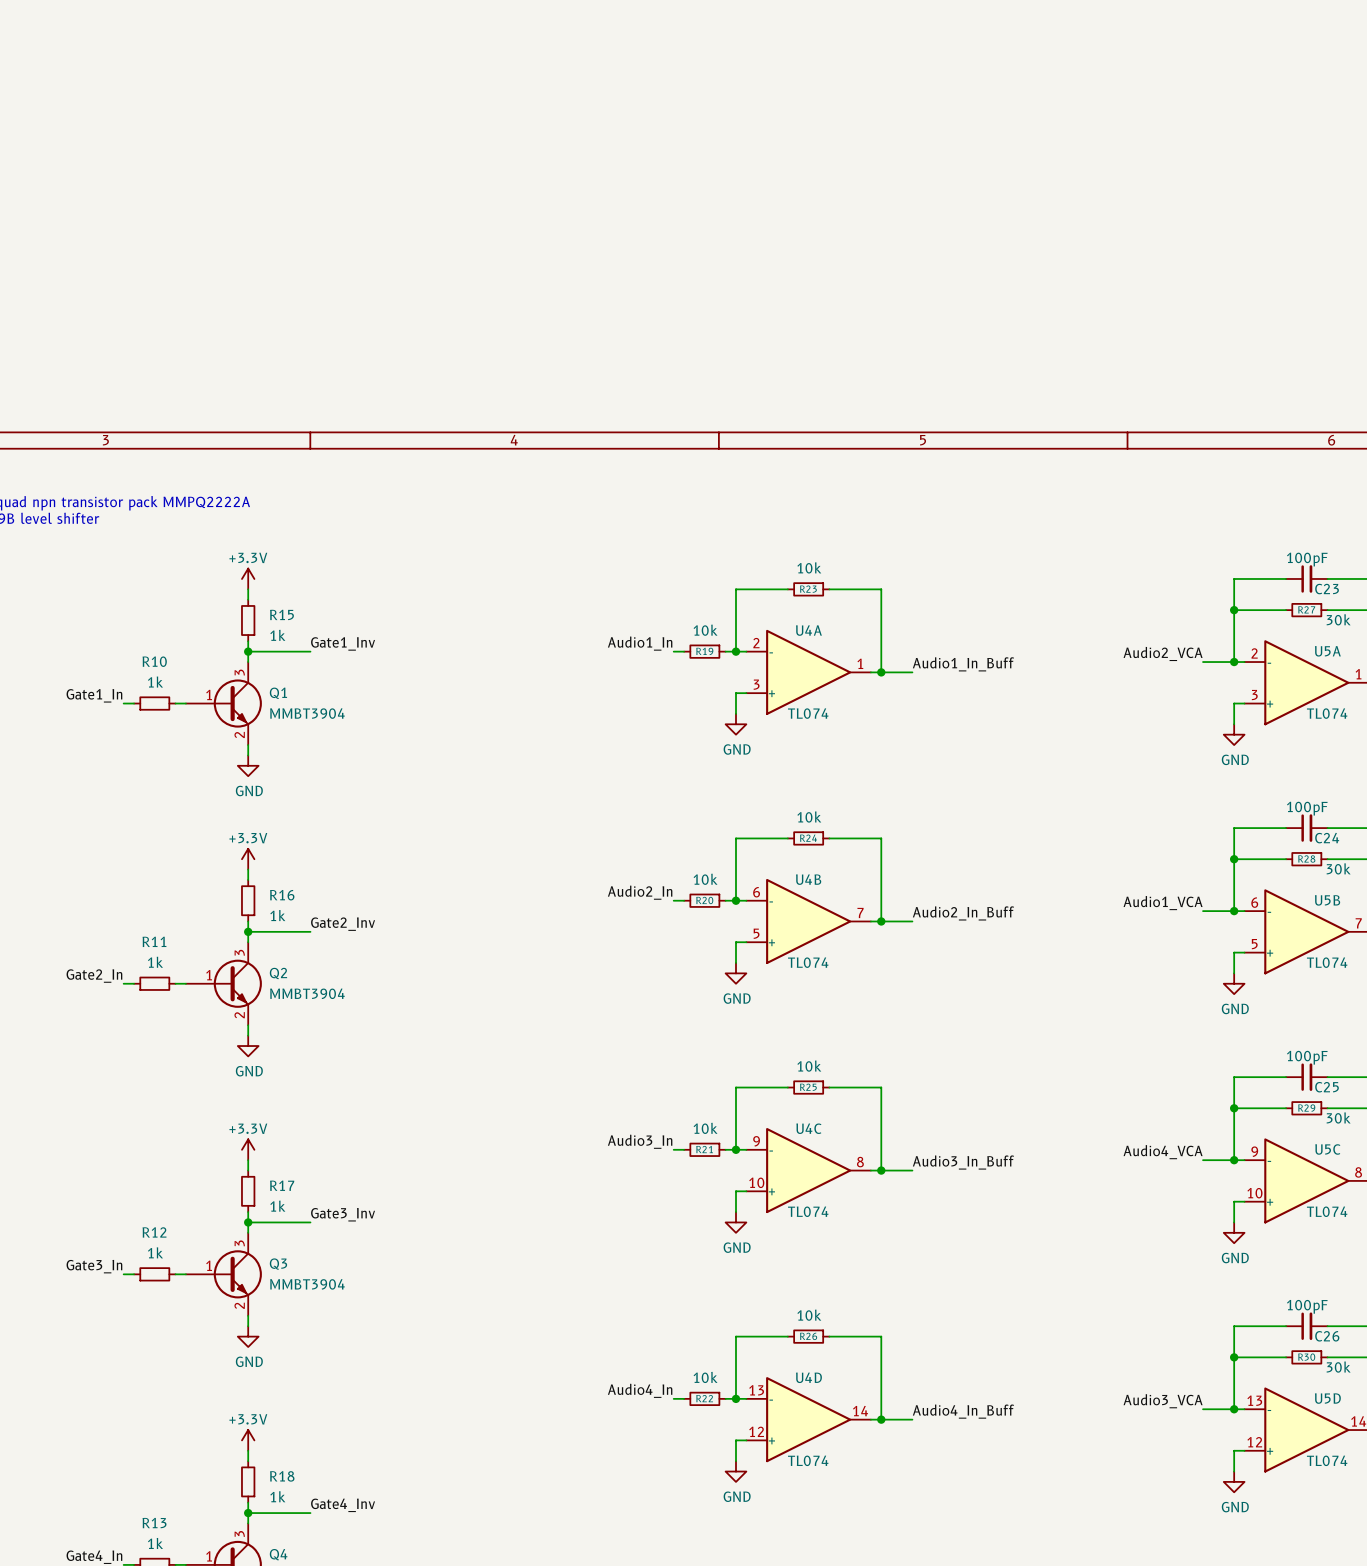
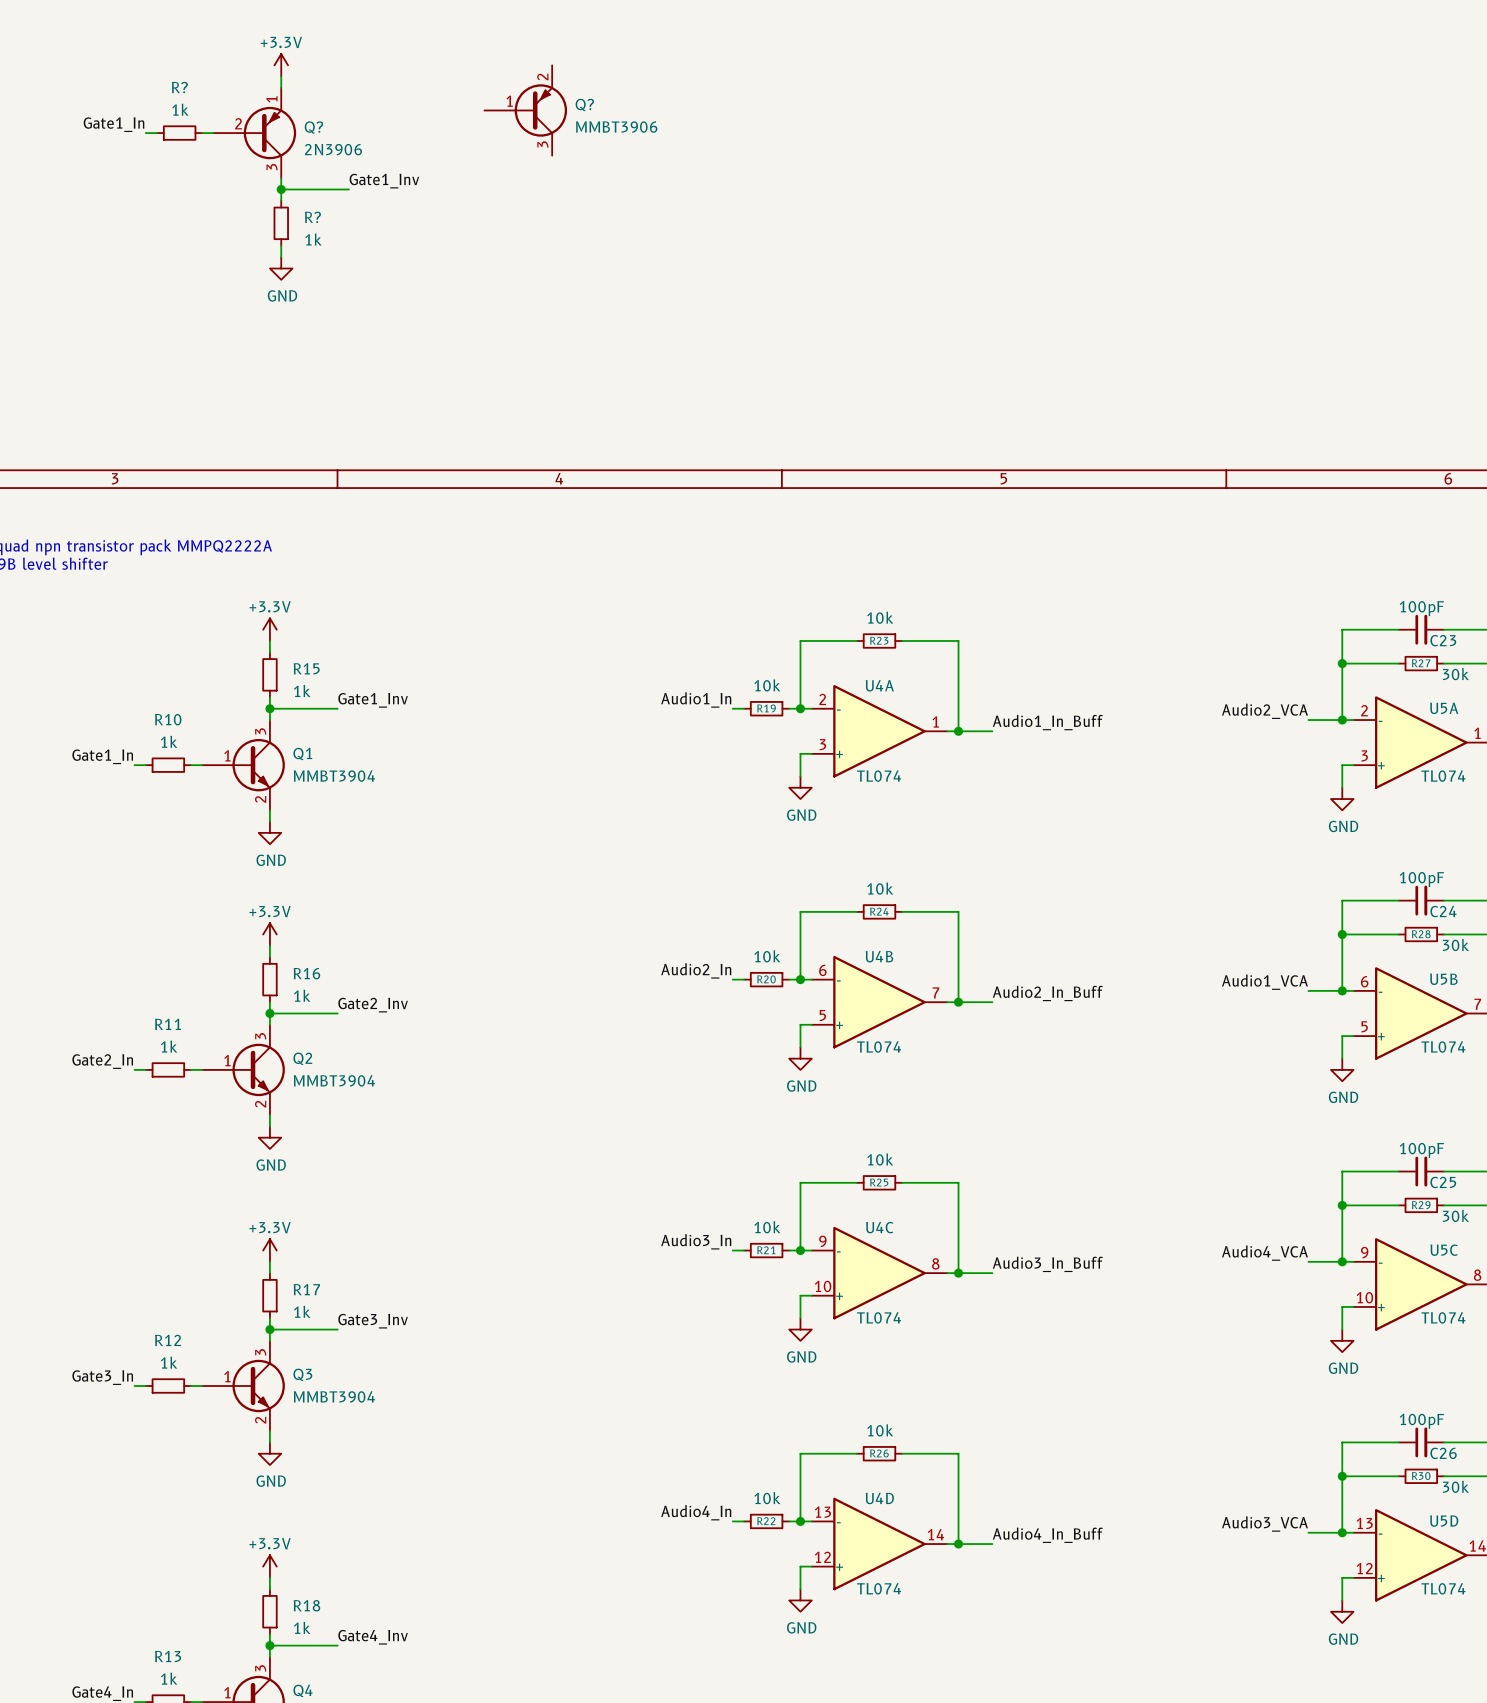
power symbol: none -> +3.3V (281, 65)
wire: none -> (281, 76) (281, 87)
Q?: none -> MMBT3906 (525, 110)
label: none -> Gate1_In (114, 124)
wire: none -> (145, 133) (157, 133)
R?: none -> 1k (179, 133)
wire: none -> (202, 133) (213, 133)
Q?: none -> 2N3906 (254, 133)
wire: none -> (281, 178) (281, 200)
label: none -> Gate1_Inv (384, 181)
wire: none -> (281, 189) (348, 189)
junction: none -> (281, 189)
R?: none -> 1k (281, 223)
wire: none -> (281, 245) (281, 257)
power symbol: none -> GND (281, 268)

